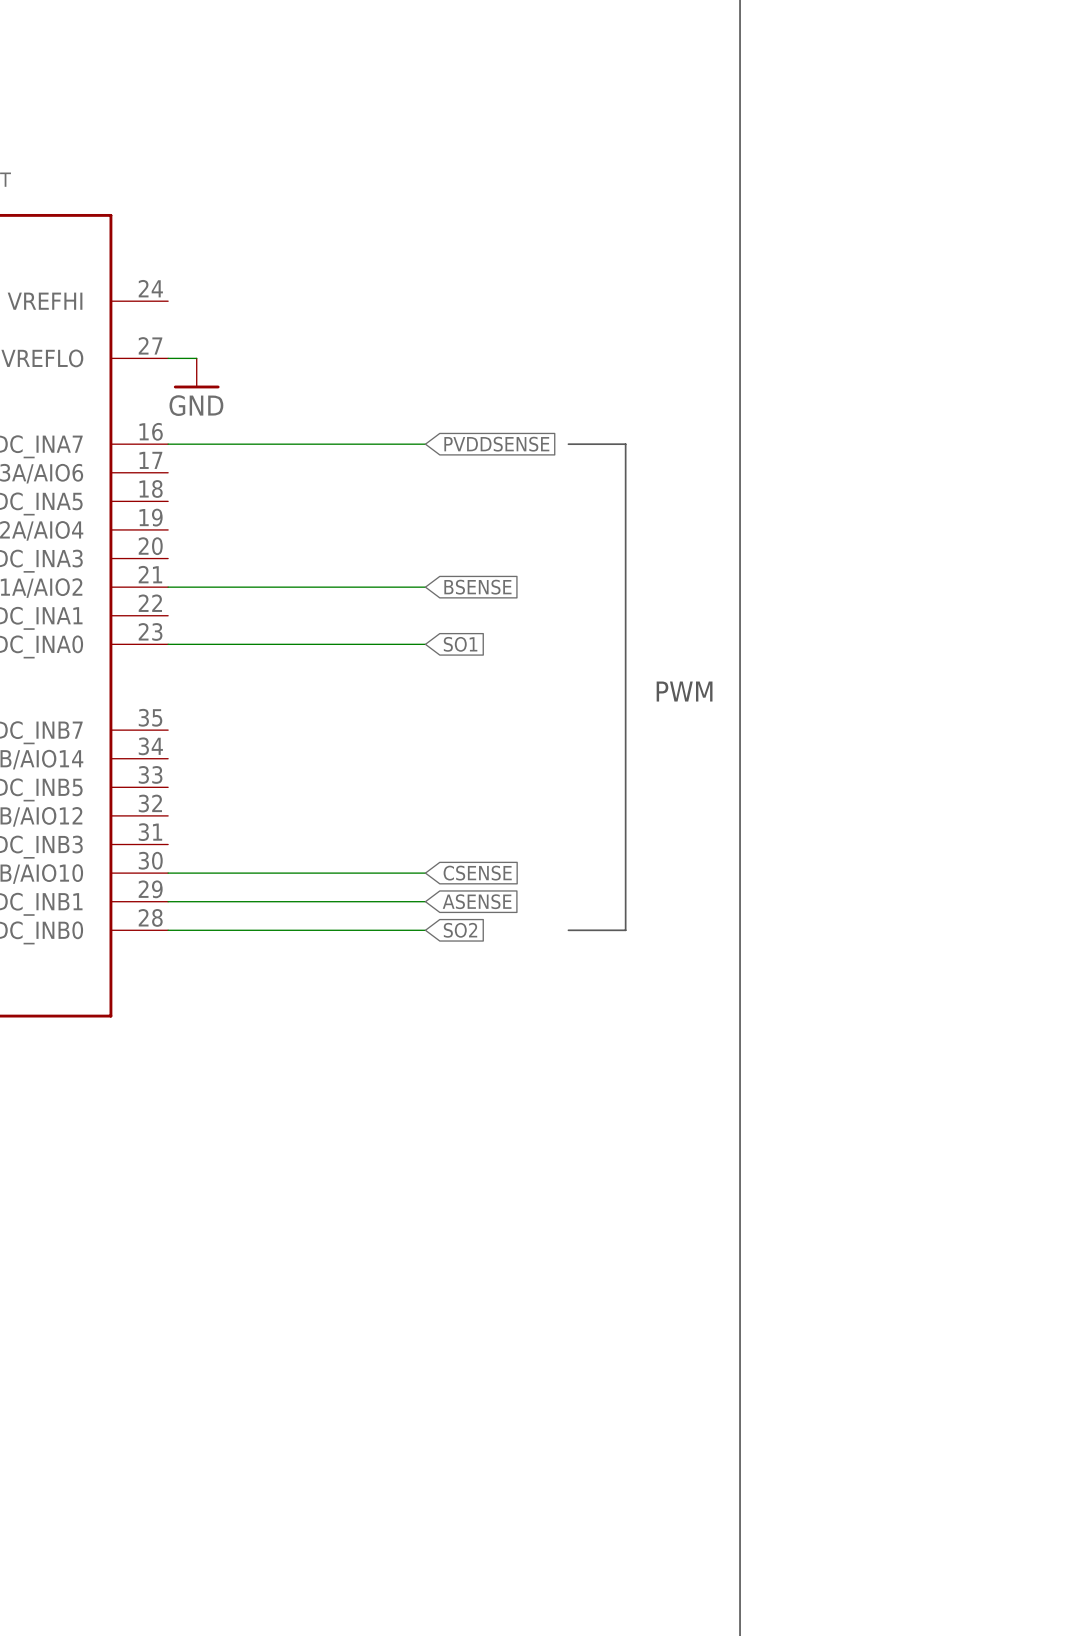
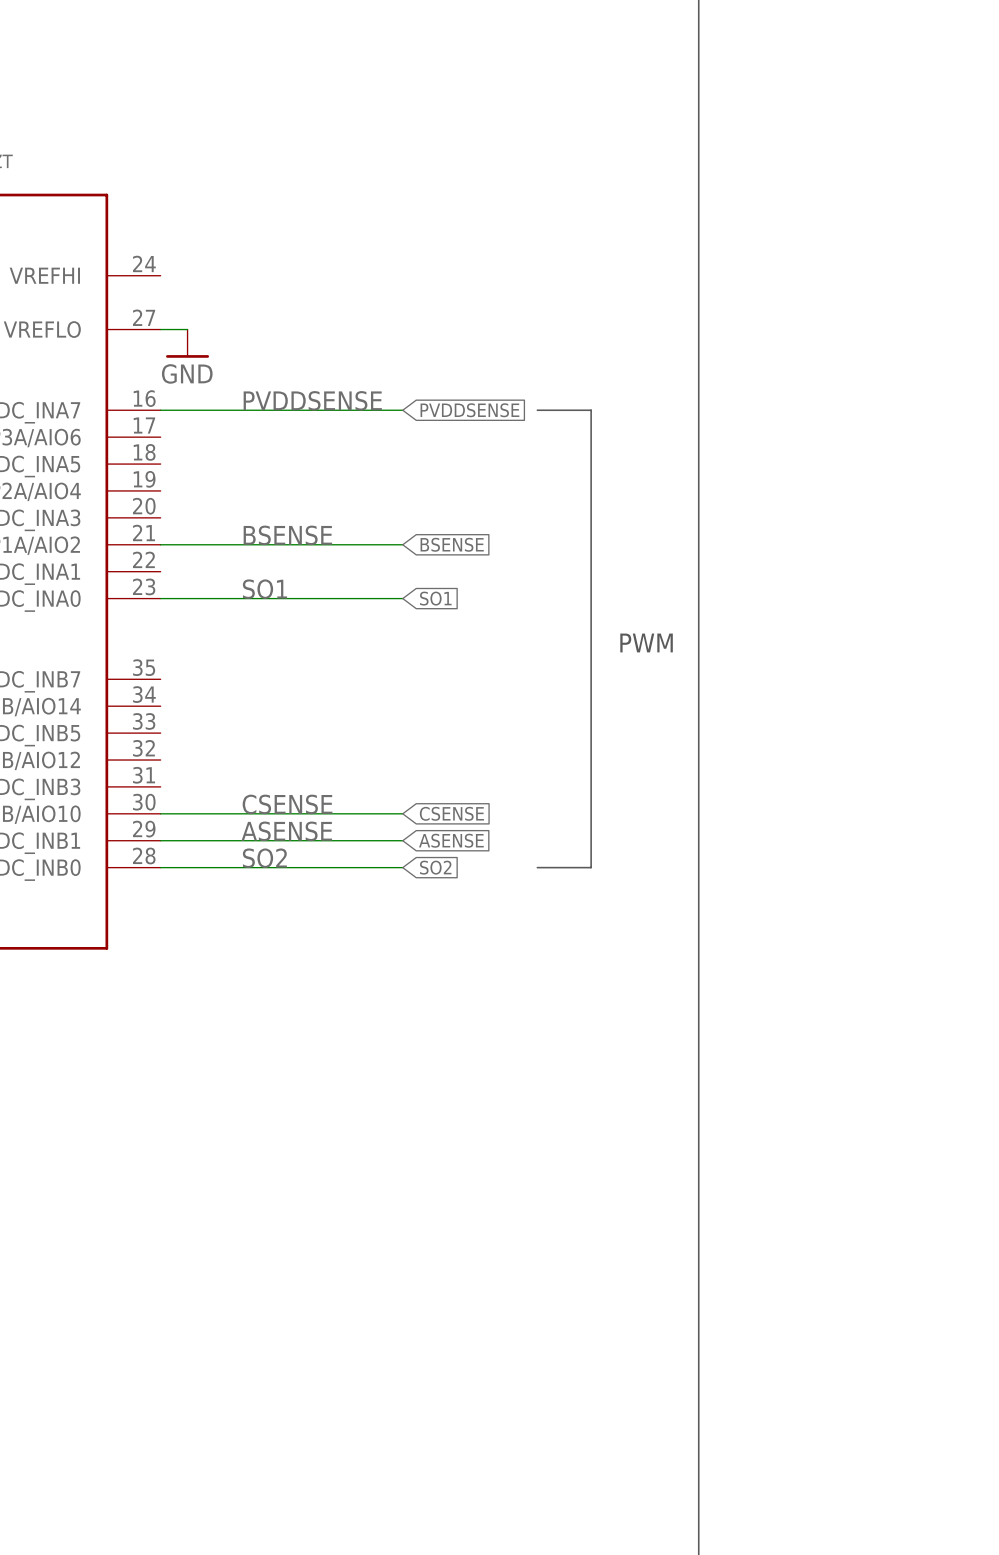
label: none -> PVDDSENSE (312, 400)
label: none -> BSENSE (287, 535)
label: none -> SO1 (264, 589)
label: none -> CSENSE (287, 804)
label: none -> ASENSE (286, 831)
label: none -> SO2 (264, 858)

